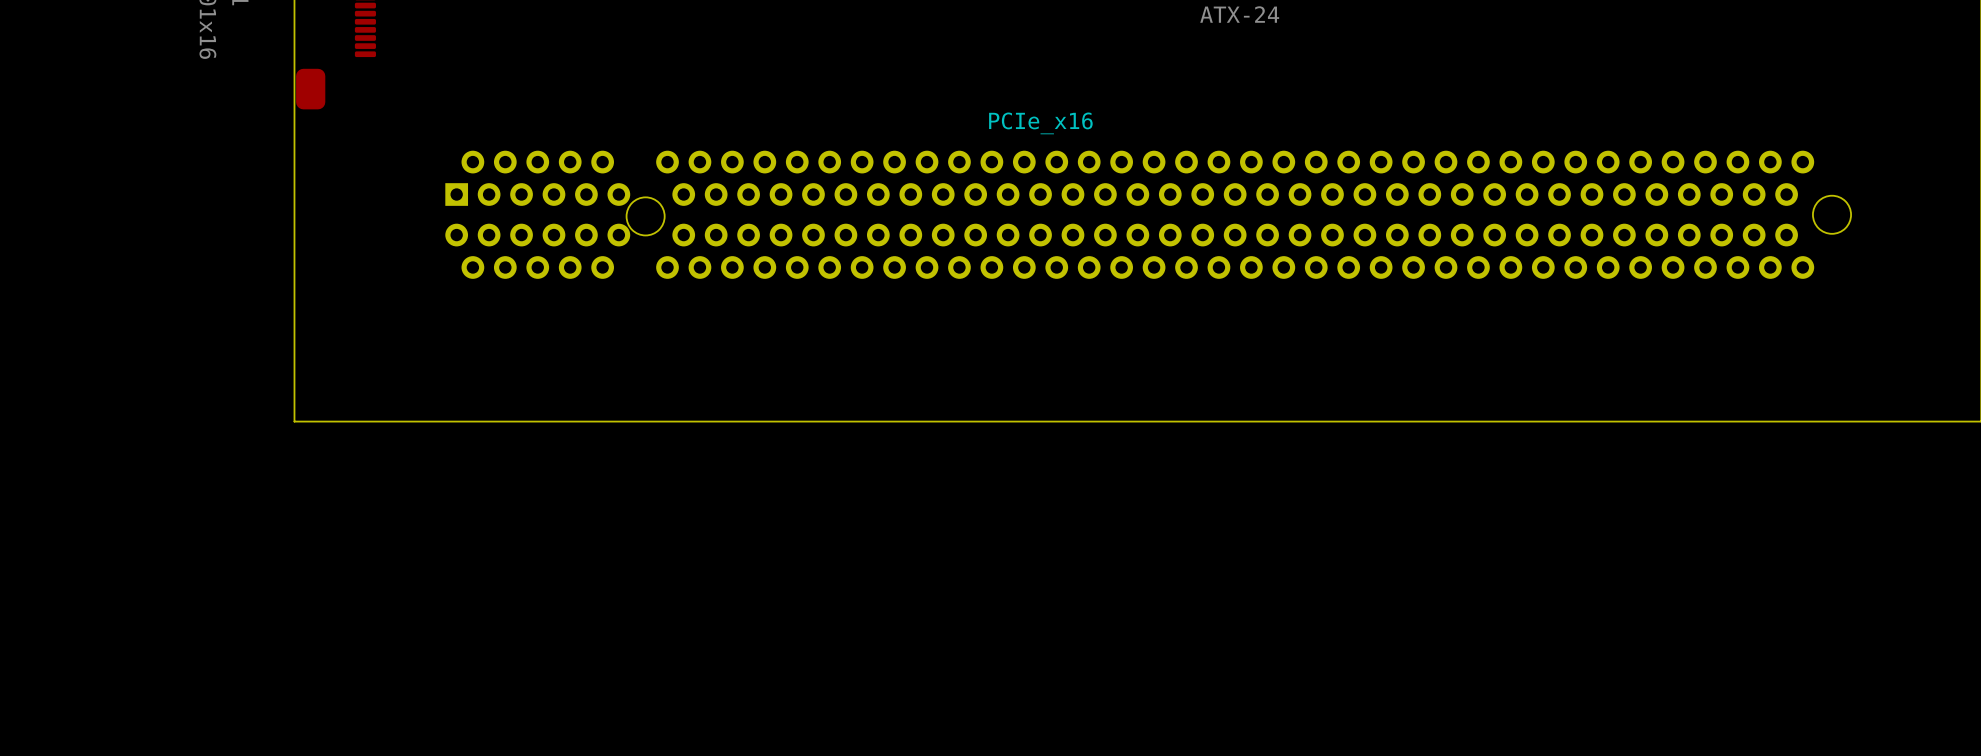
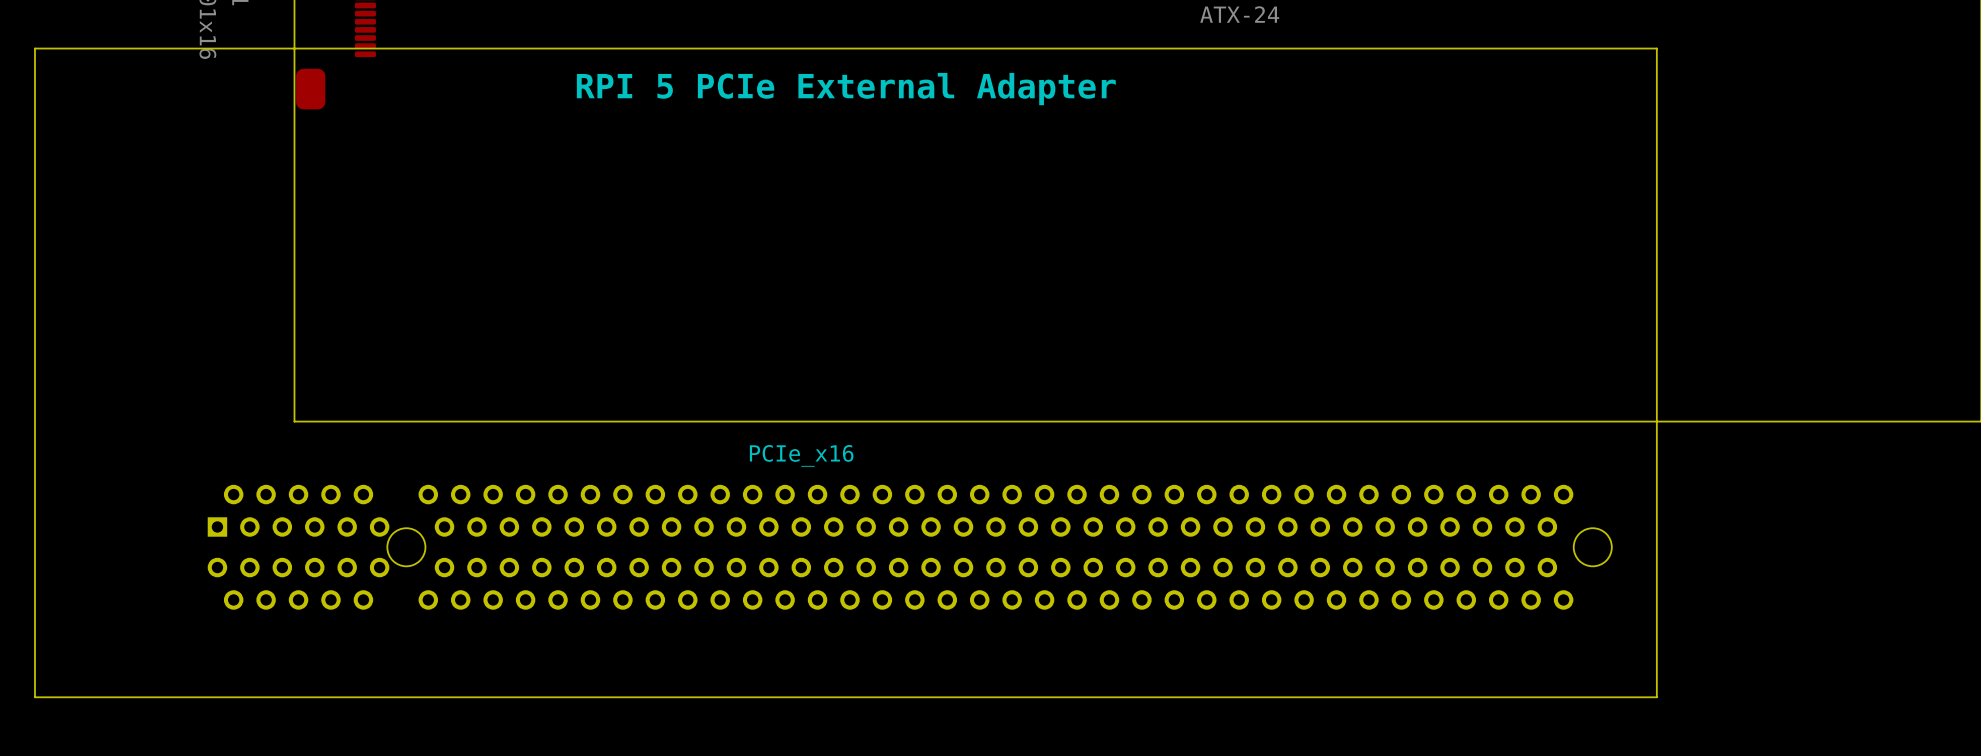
board edge: none -> (34, 48) (34, 697) (1656, 697) (1656, 48) (34, 48)
text: none -> RPI 5 PCIe External Adapter (846, 89)
PCIe_x16 footprint: [445, 150, 1852, 279] -> [207, 484, 1612, 610]

